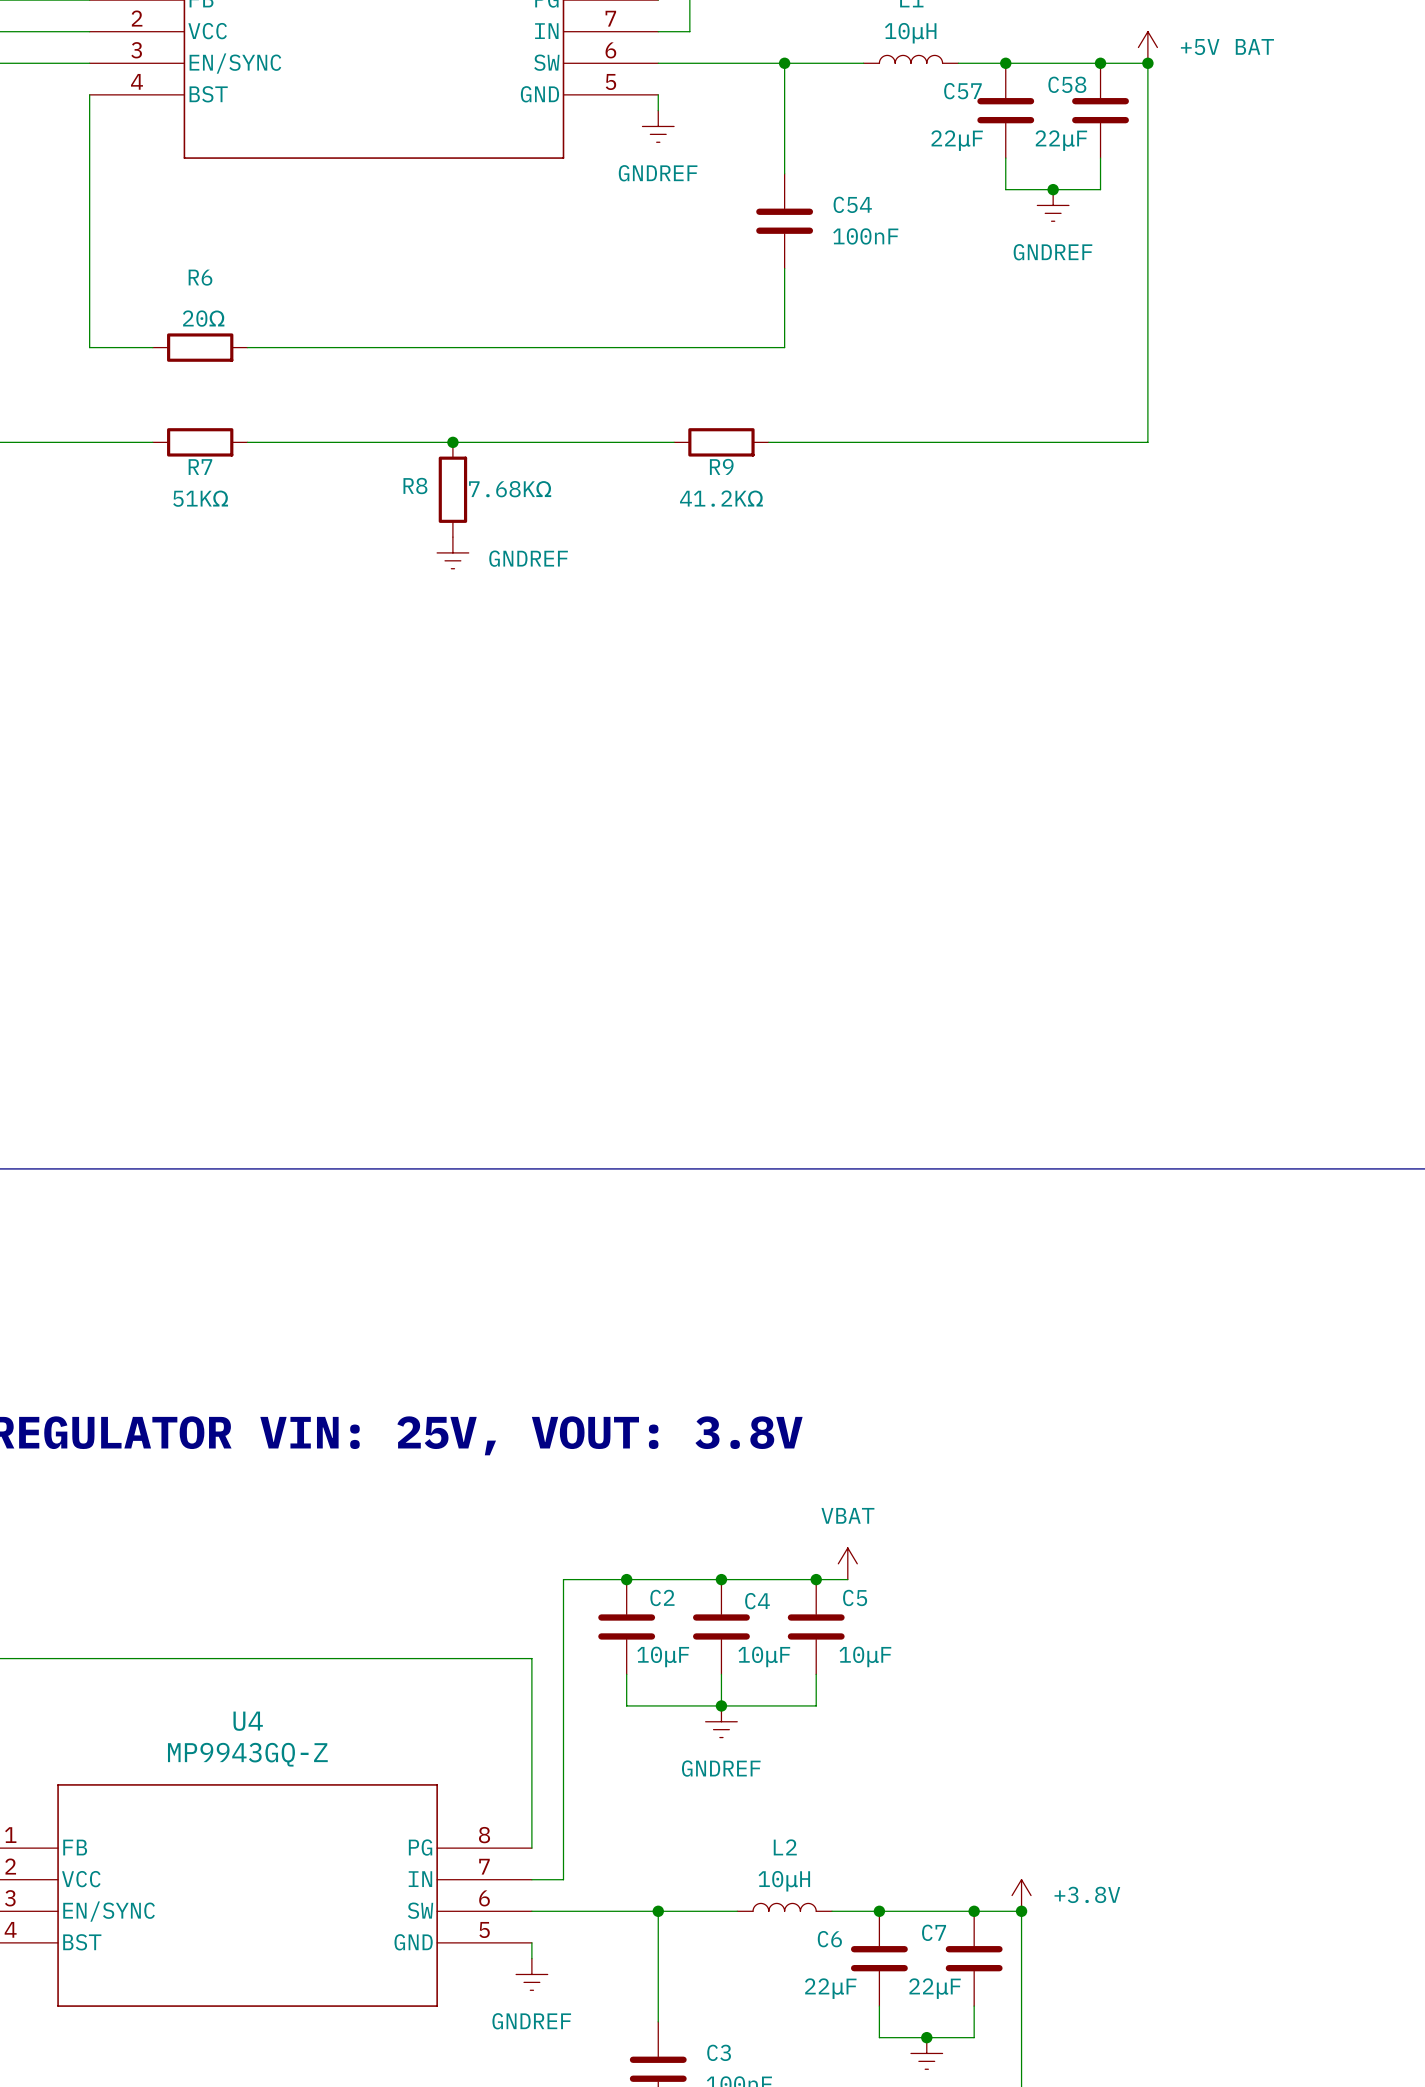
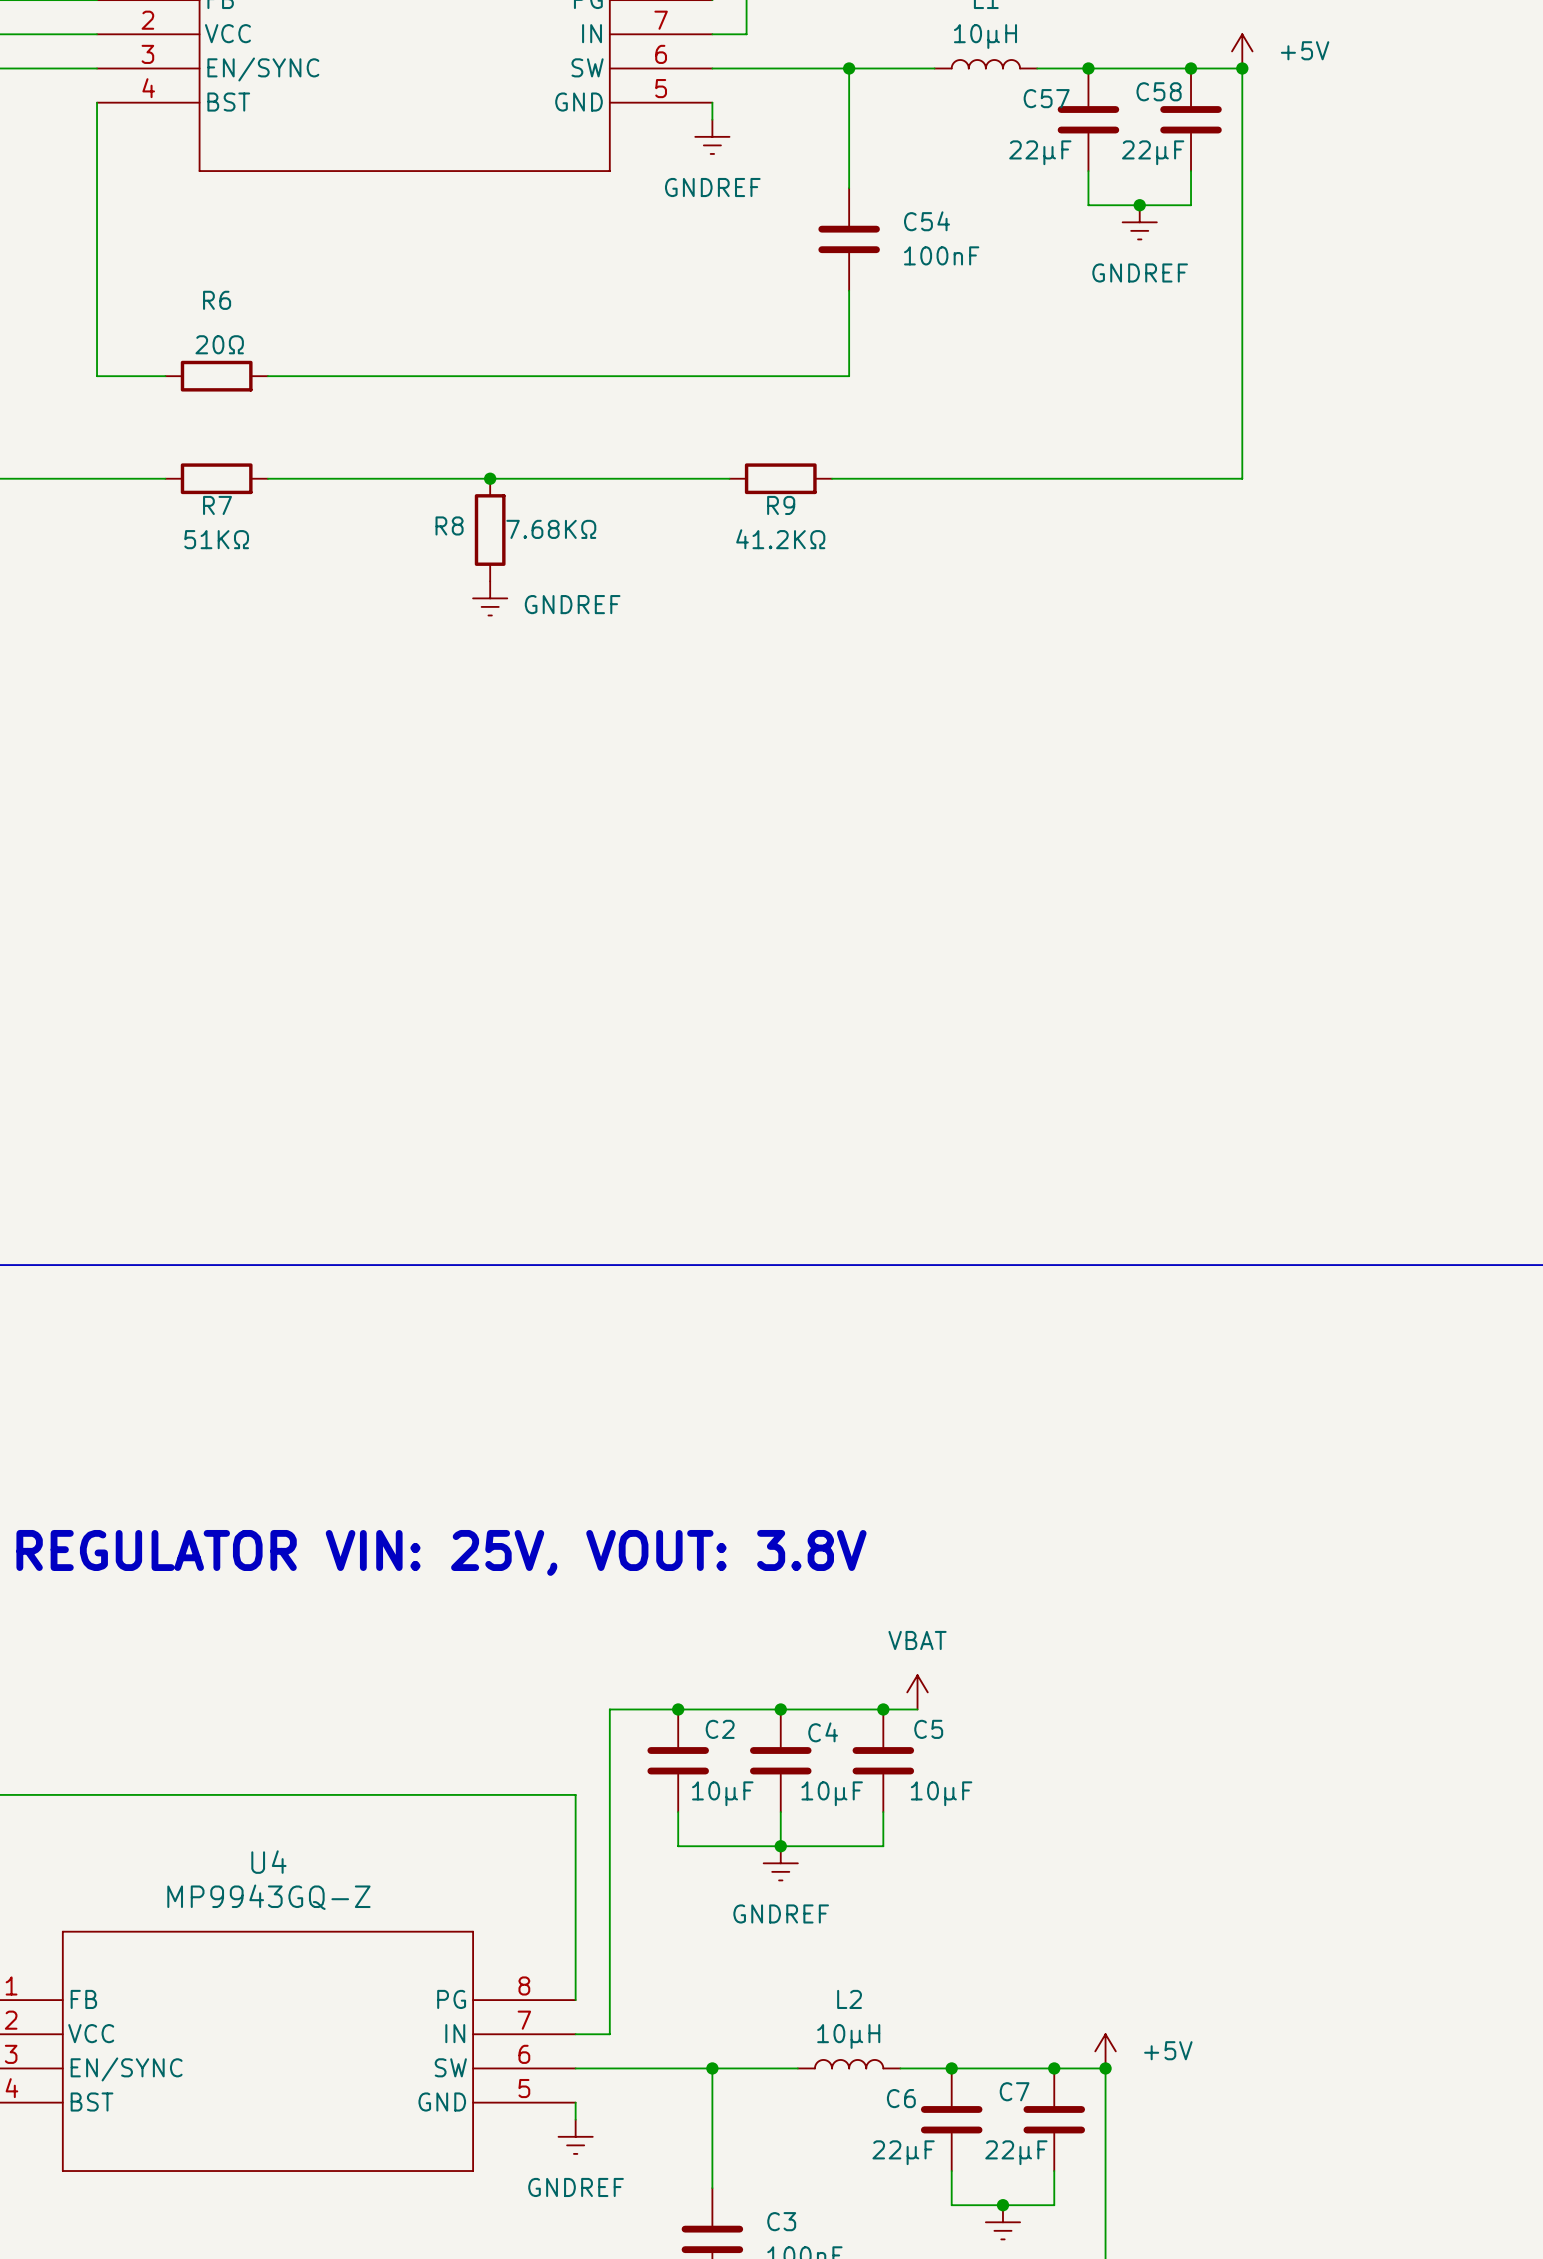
power symbol: +5V BAT (1147, 47) -> +5V (1242, 51)
power symbol: +3.8V (1021, 1895) -> +5V (1105, 2051)

